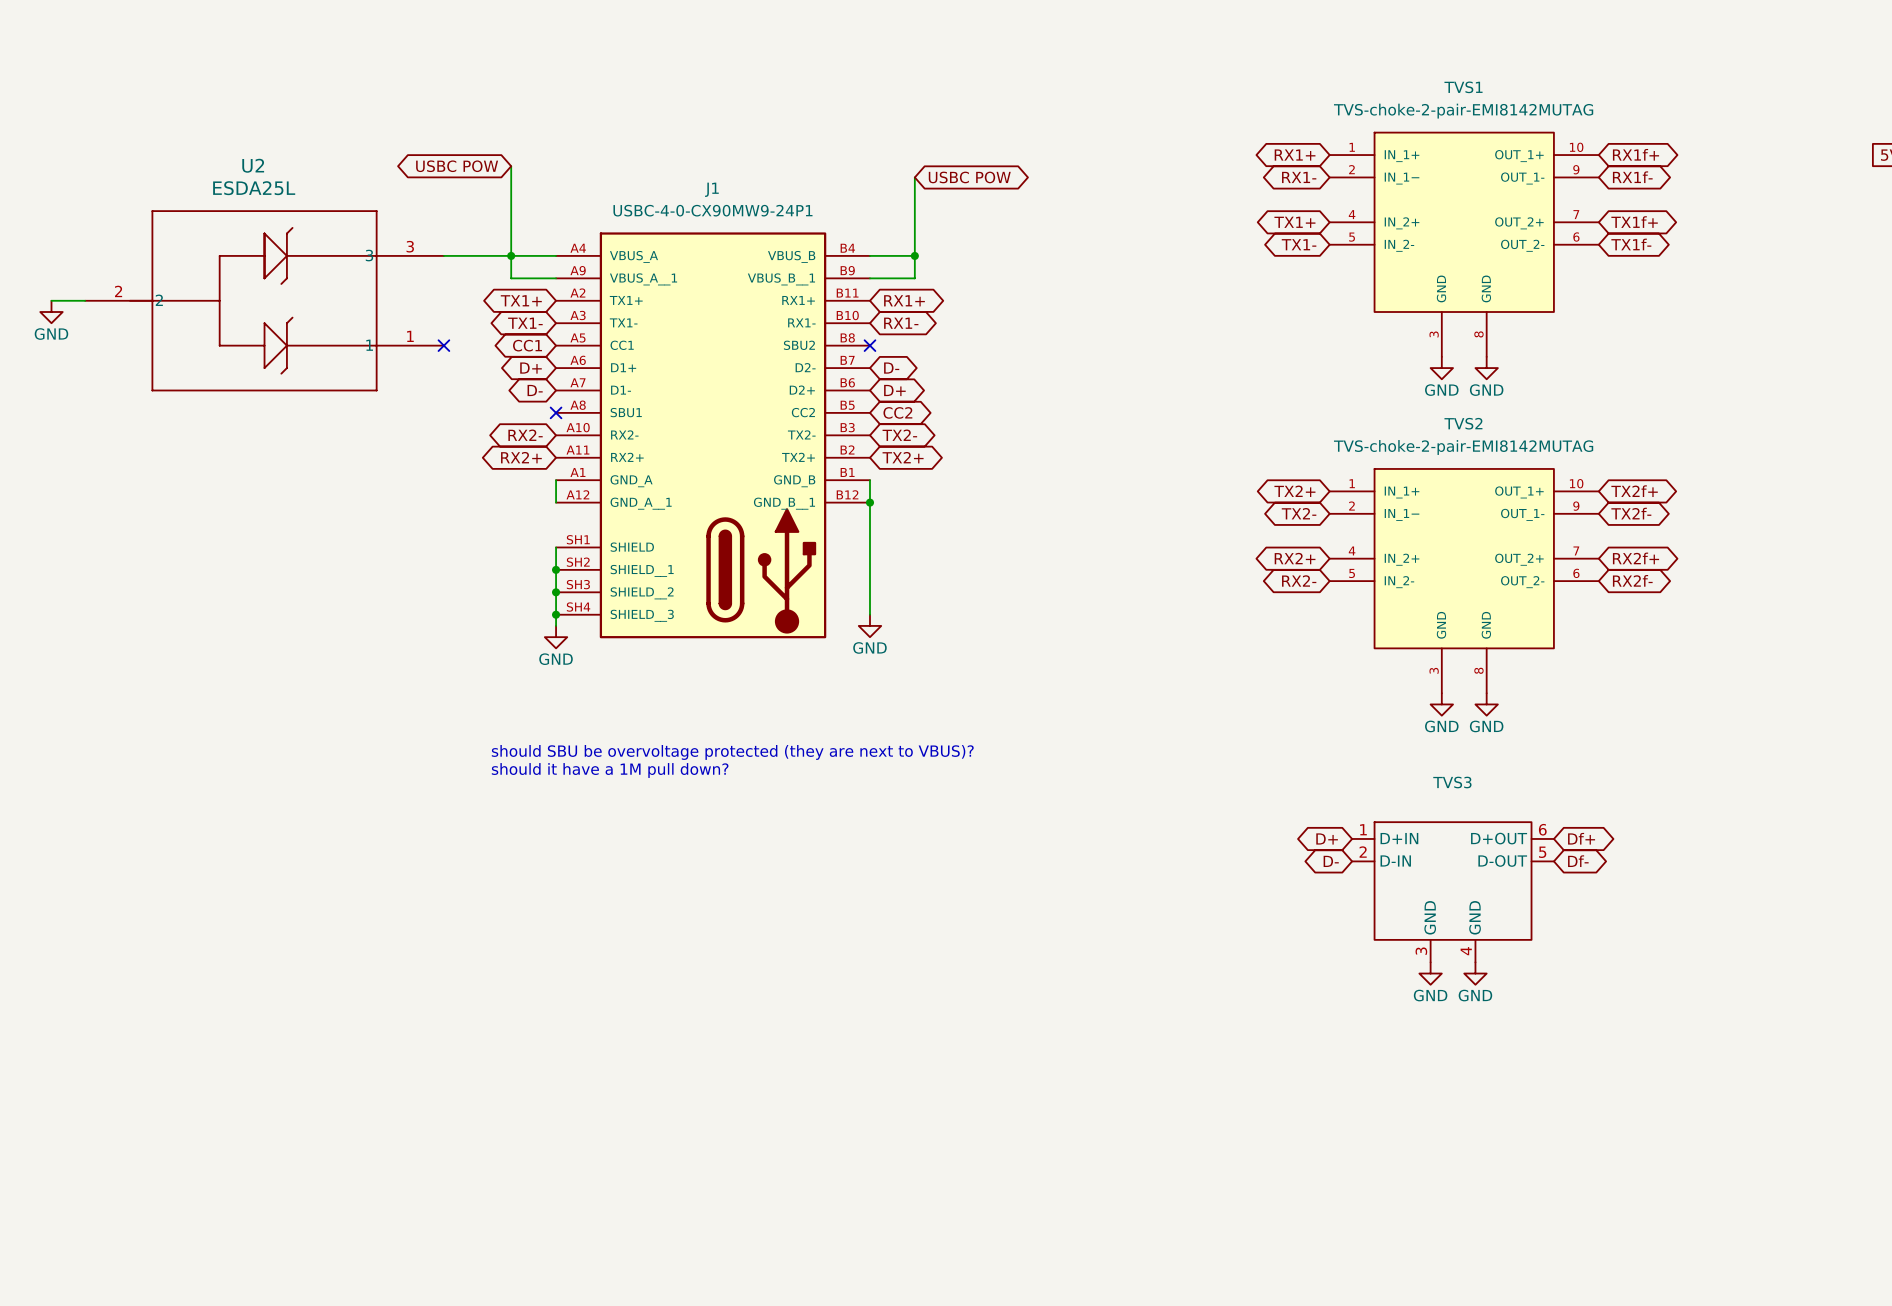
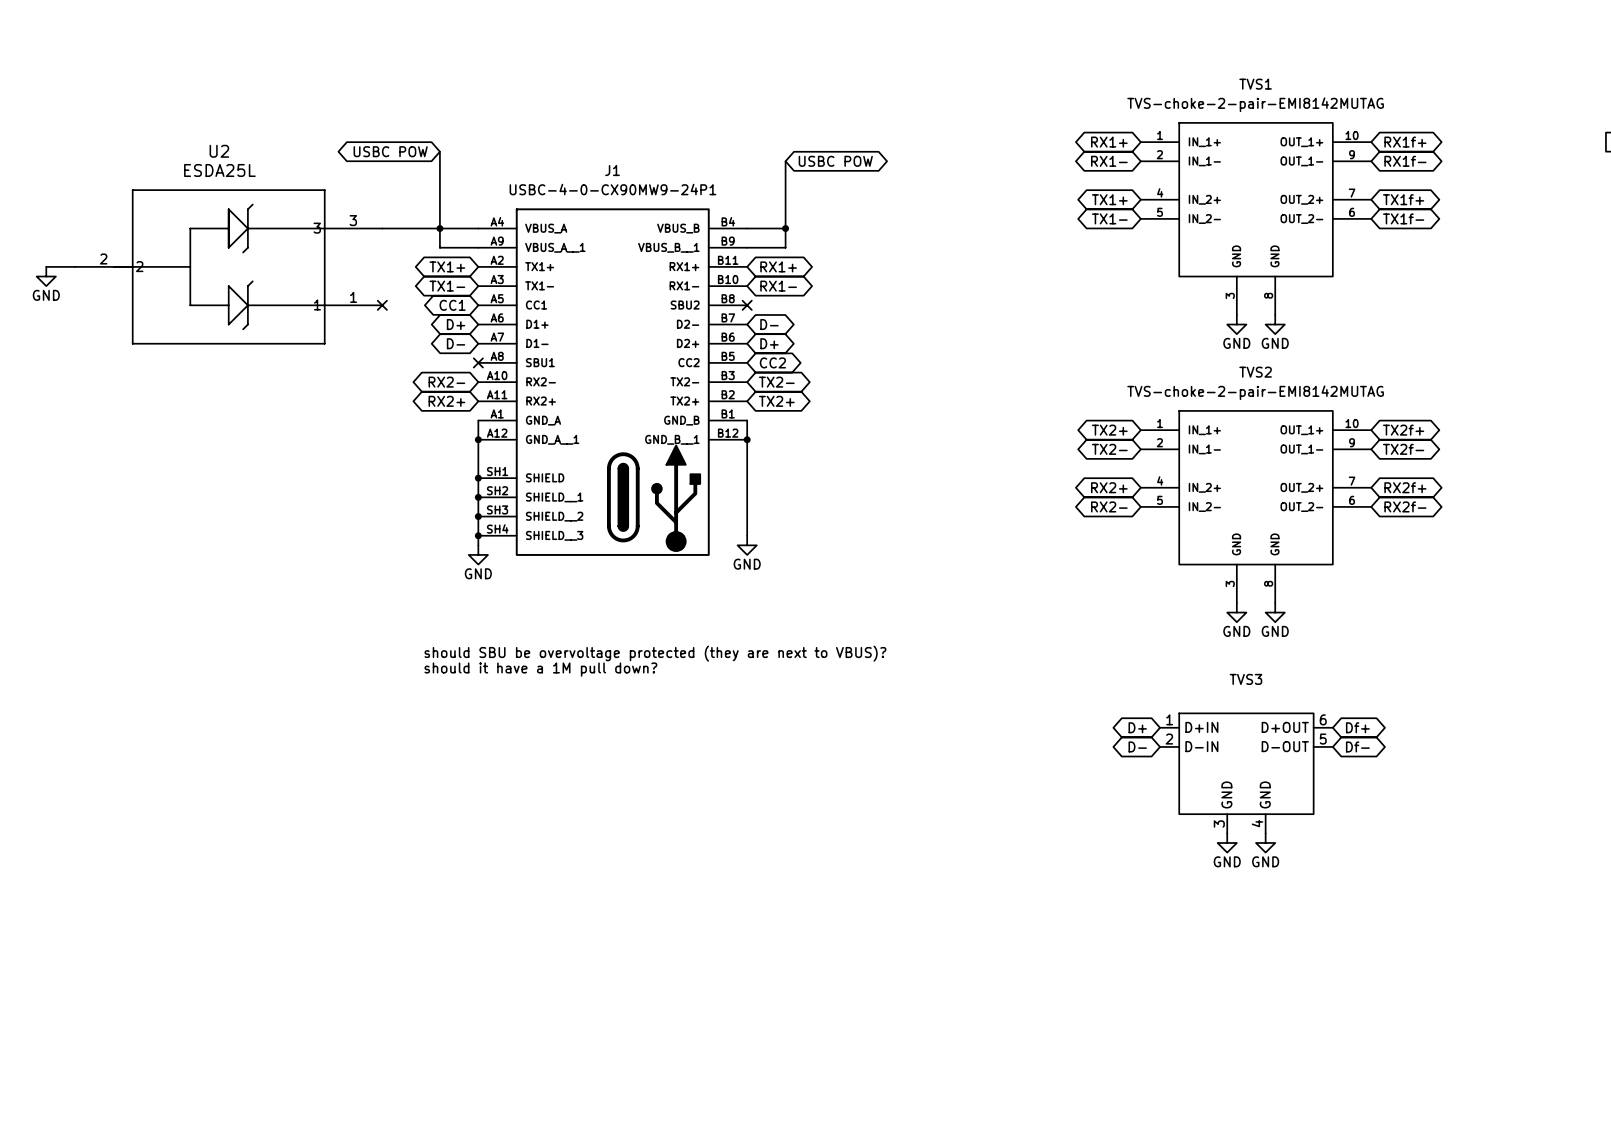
wire: none -> (478, 439) (478, 478)
junction: none -> (478, 439)
junction: none -> (478, 478)

